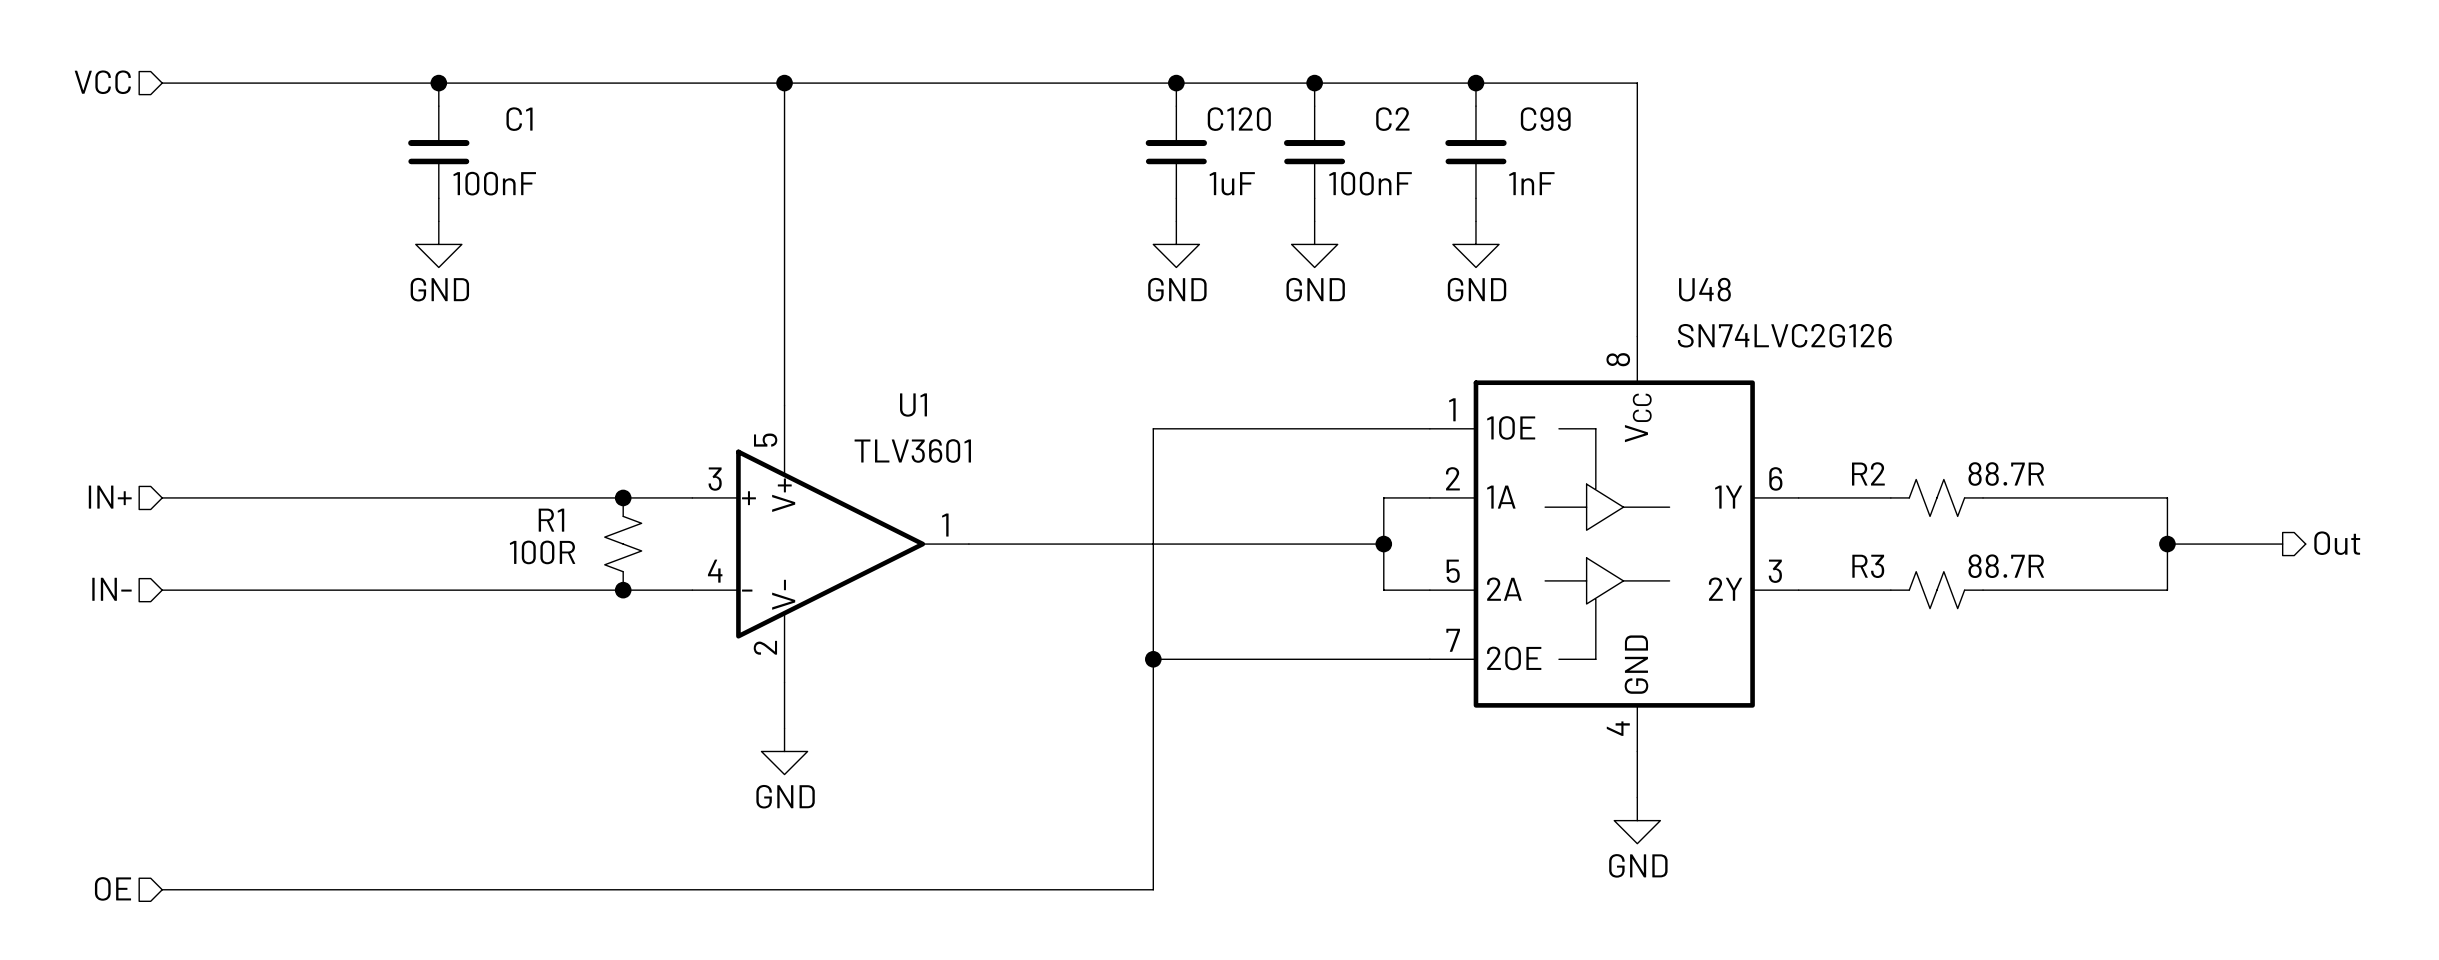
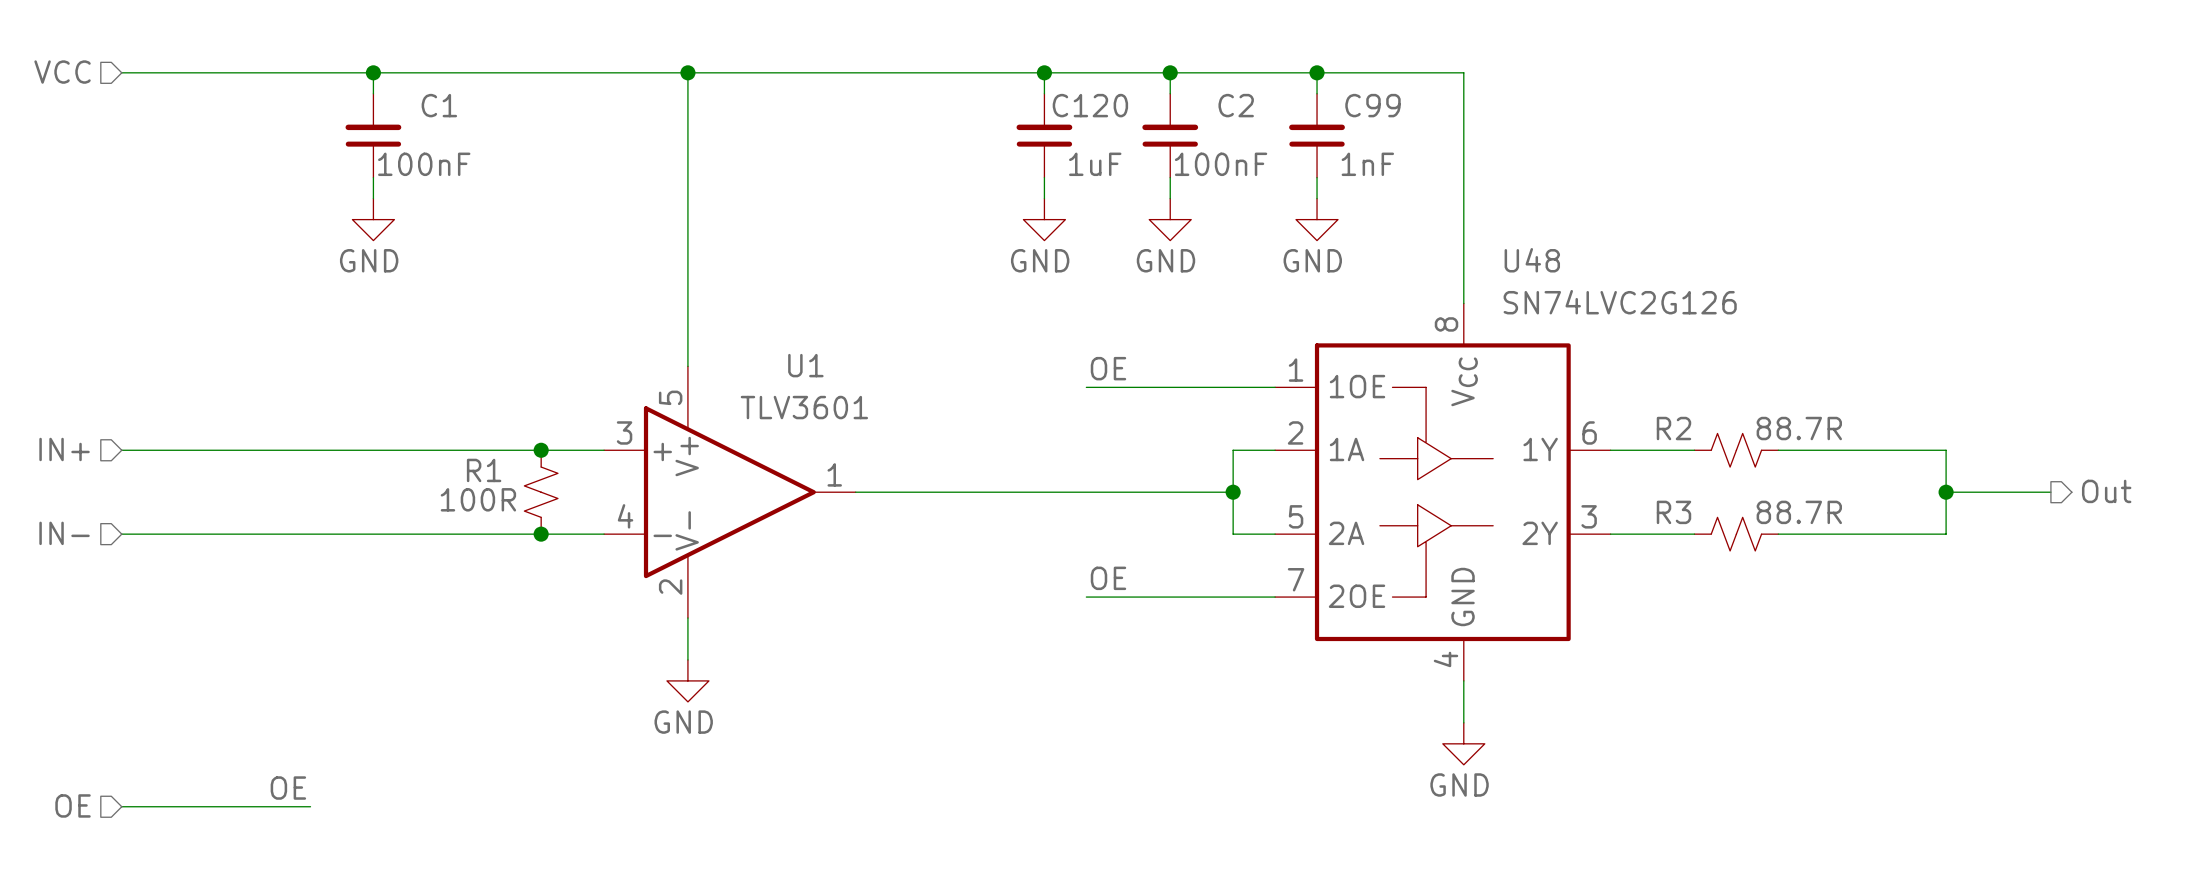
label: none -> OE (1108, 368)
wire: (1222, 428) (1153, 428) (1153, 889) (369, 889) -> none
label: none -> OE (1108, 578)
wire: (1153, 659) (1222, 659) -> none
junction: (1153, 659) -> none
label: none -> OE (288, 788)

